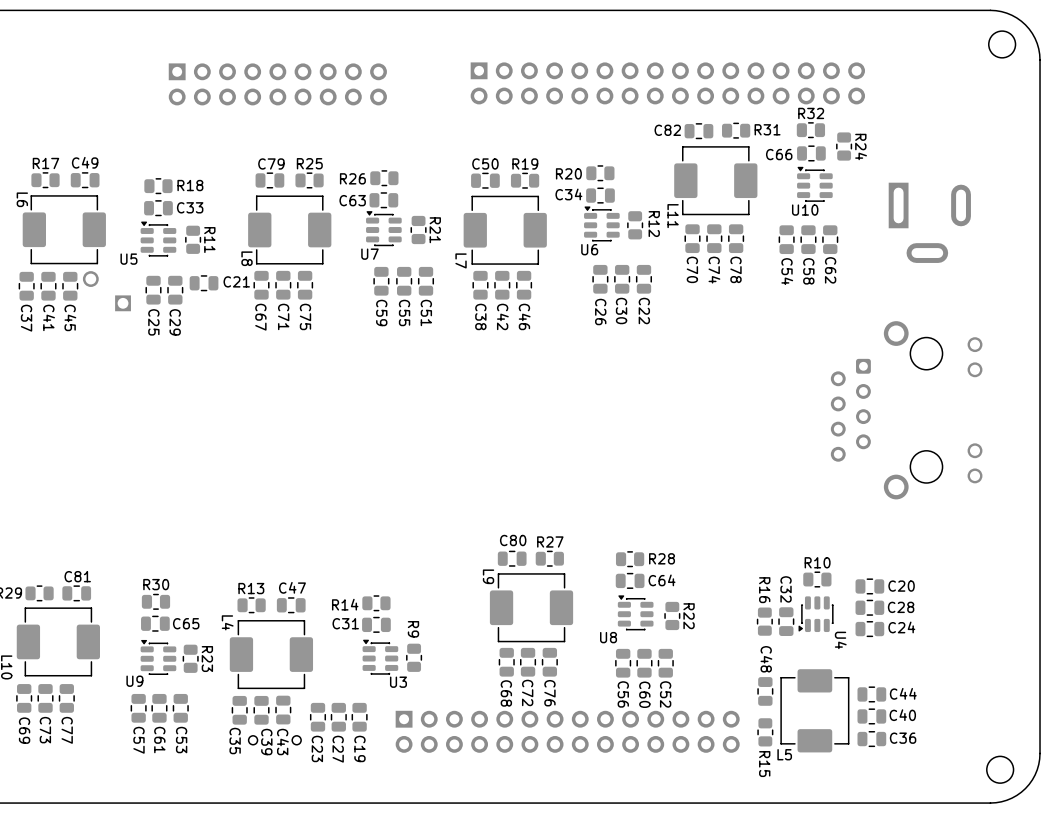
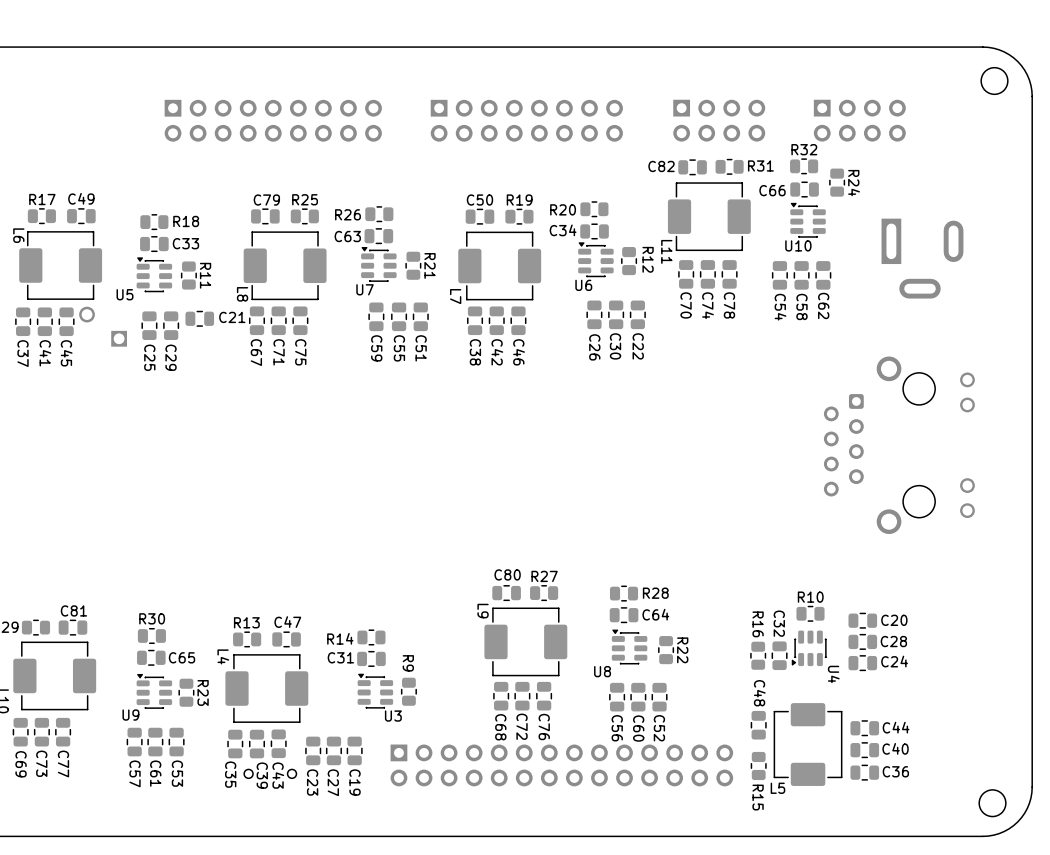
part: (667, 83) -> none
part: none -> (526, 120)
part: none -> (719, 120)
part: none -> (859, 120)

